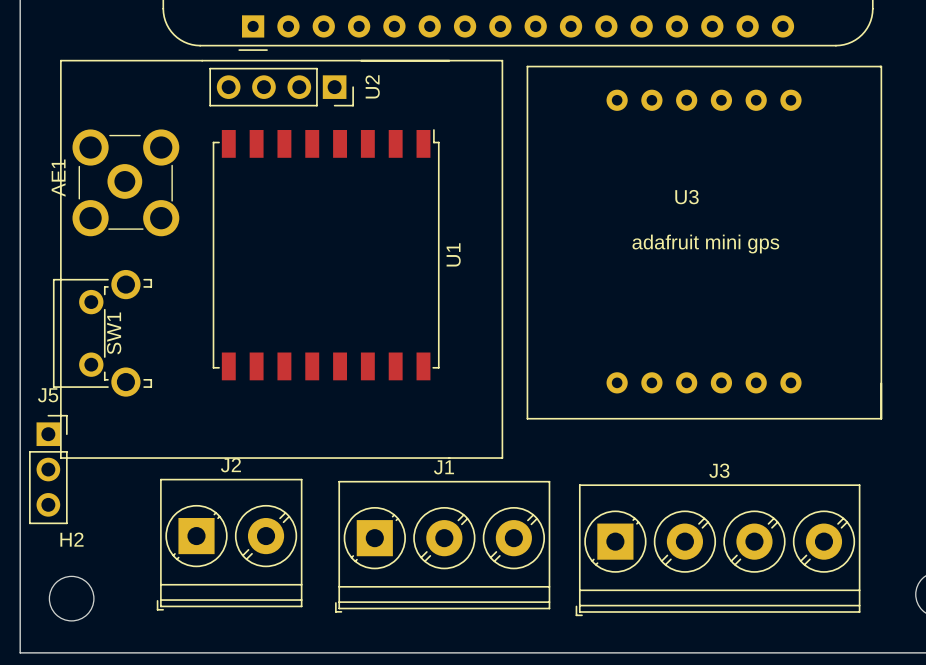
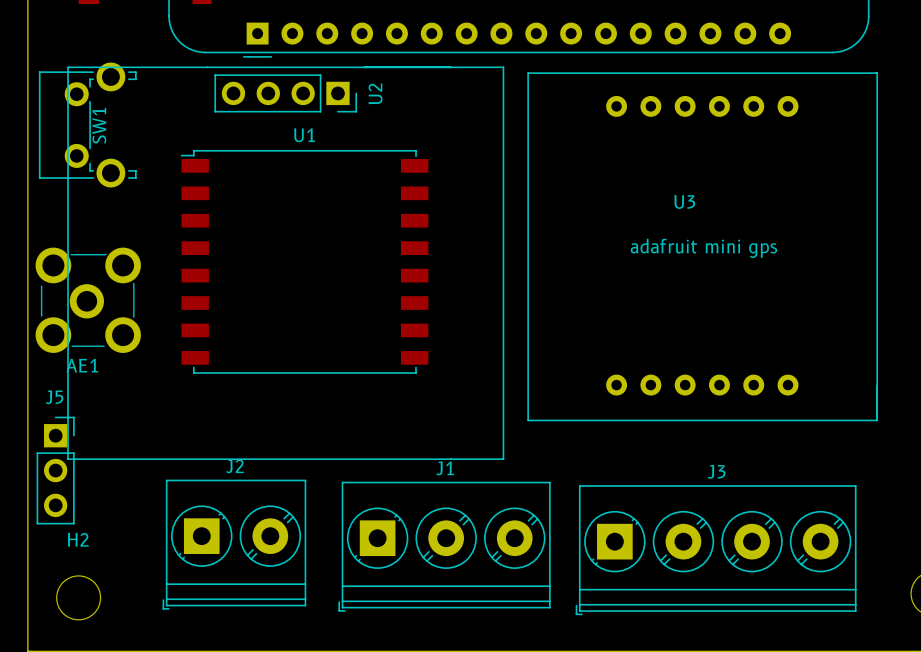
AE1 rotation: 0° (125, 182) -> 90° counterclockwise (88, 300)
AE1 position: (125, 182) -> (88, 300)
U1 rotation: 0° (326, 254) -> 90° counterclockwise (304, 261)
SW1 position: (102, 333) -> (87, 125)

